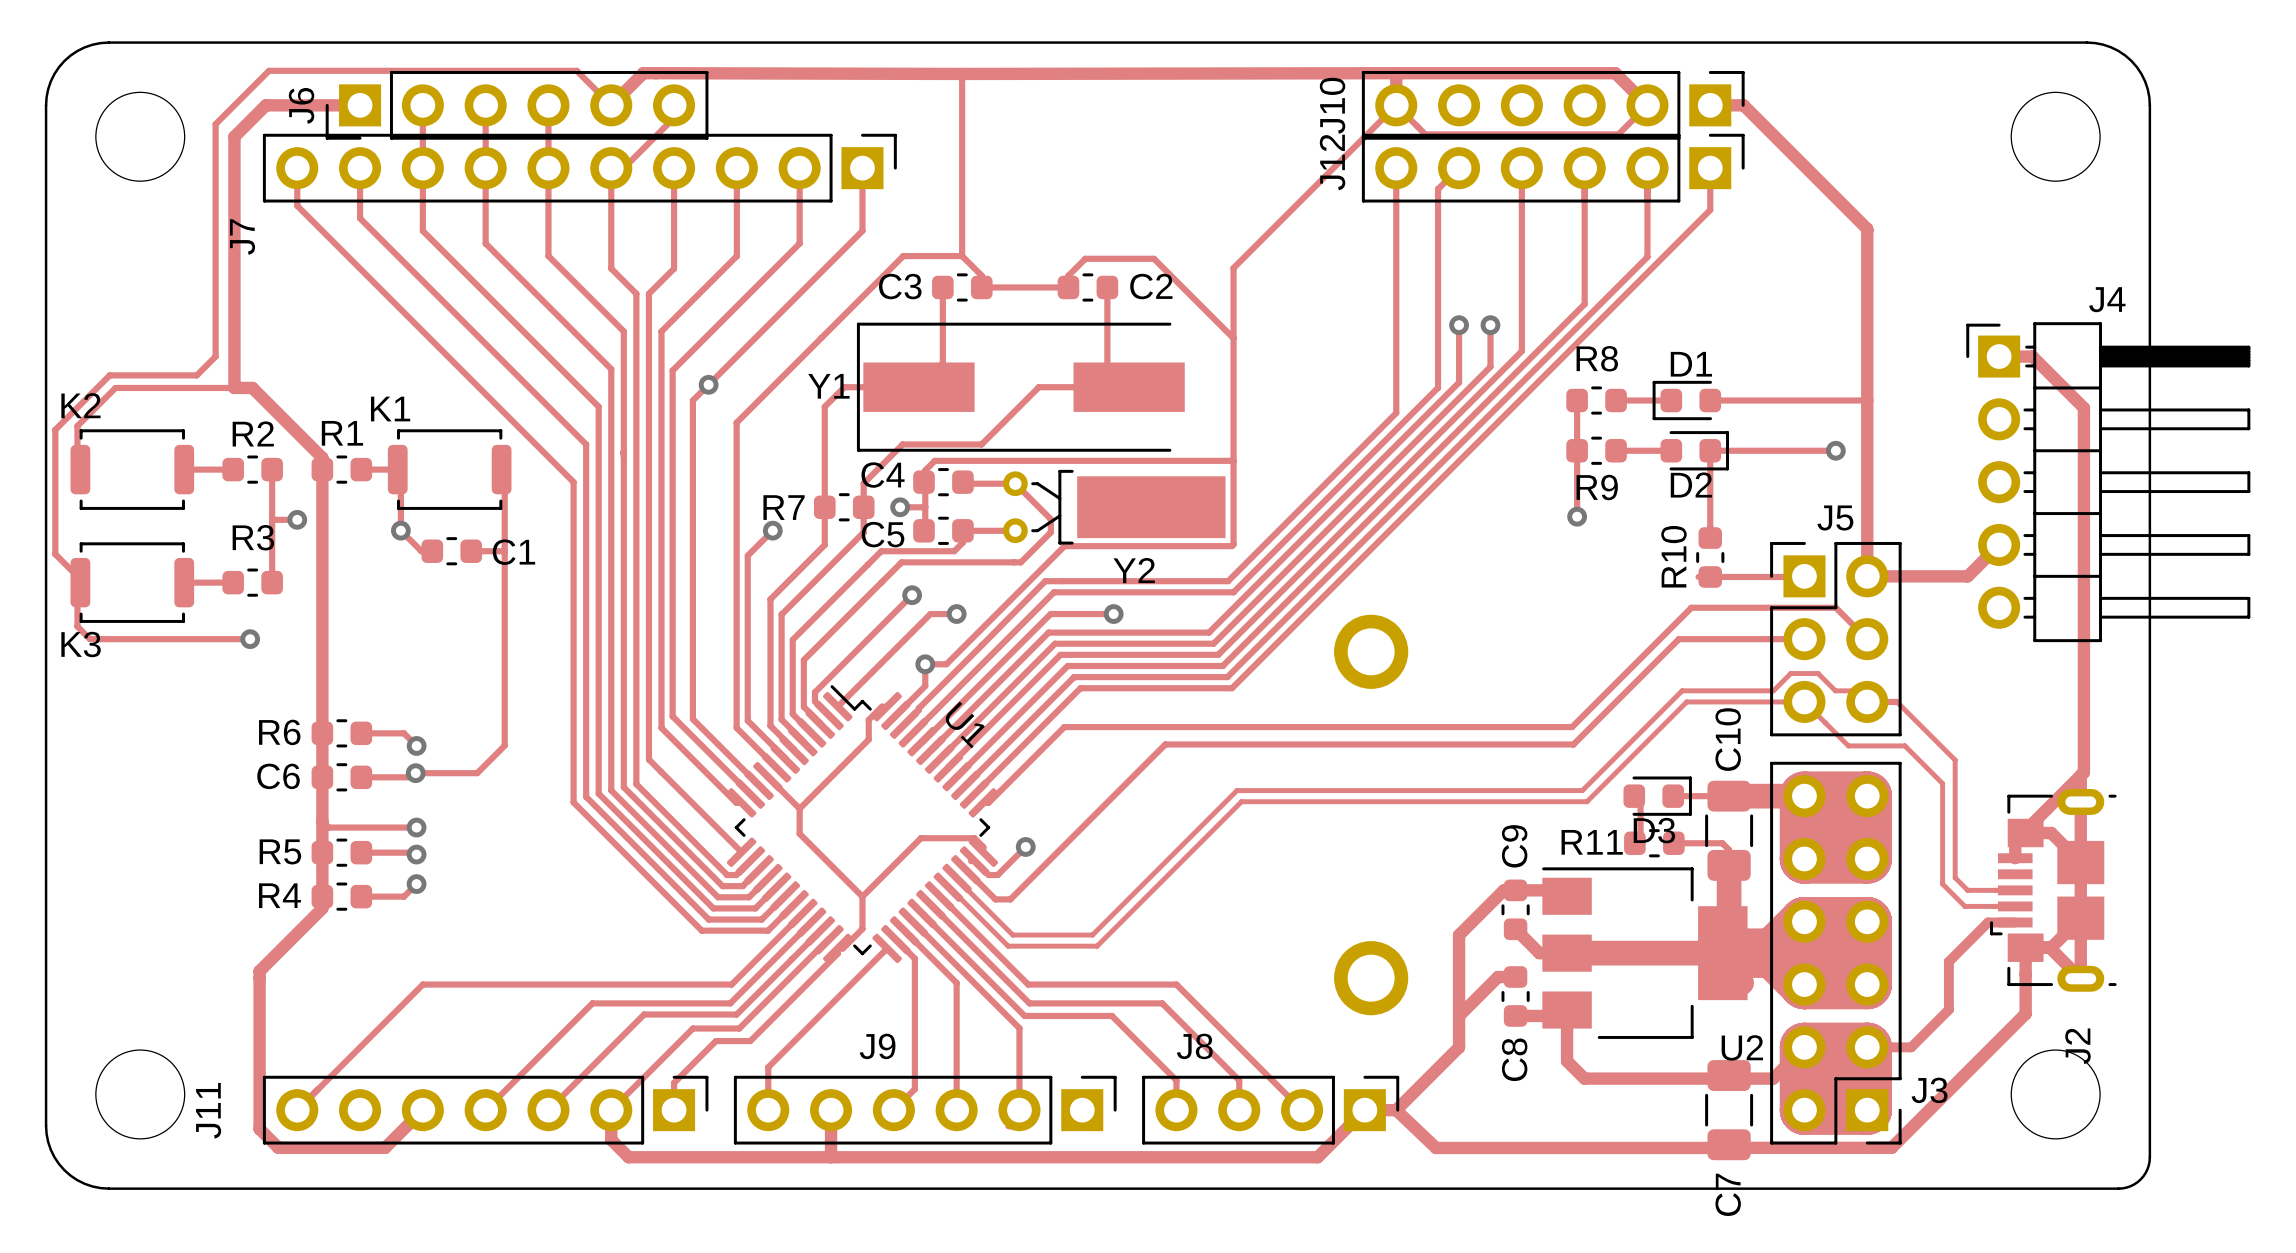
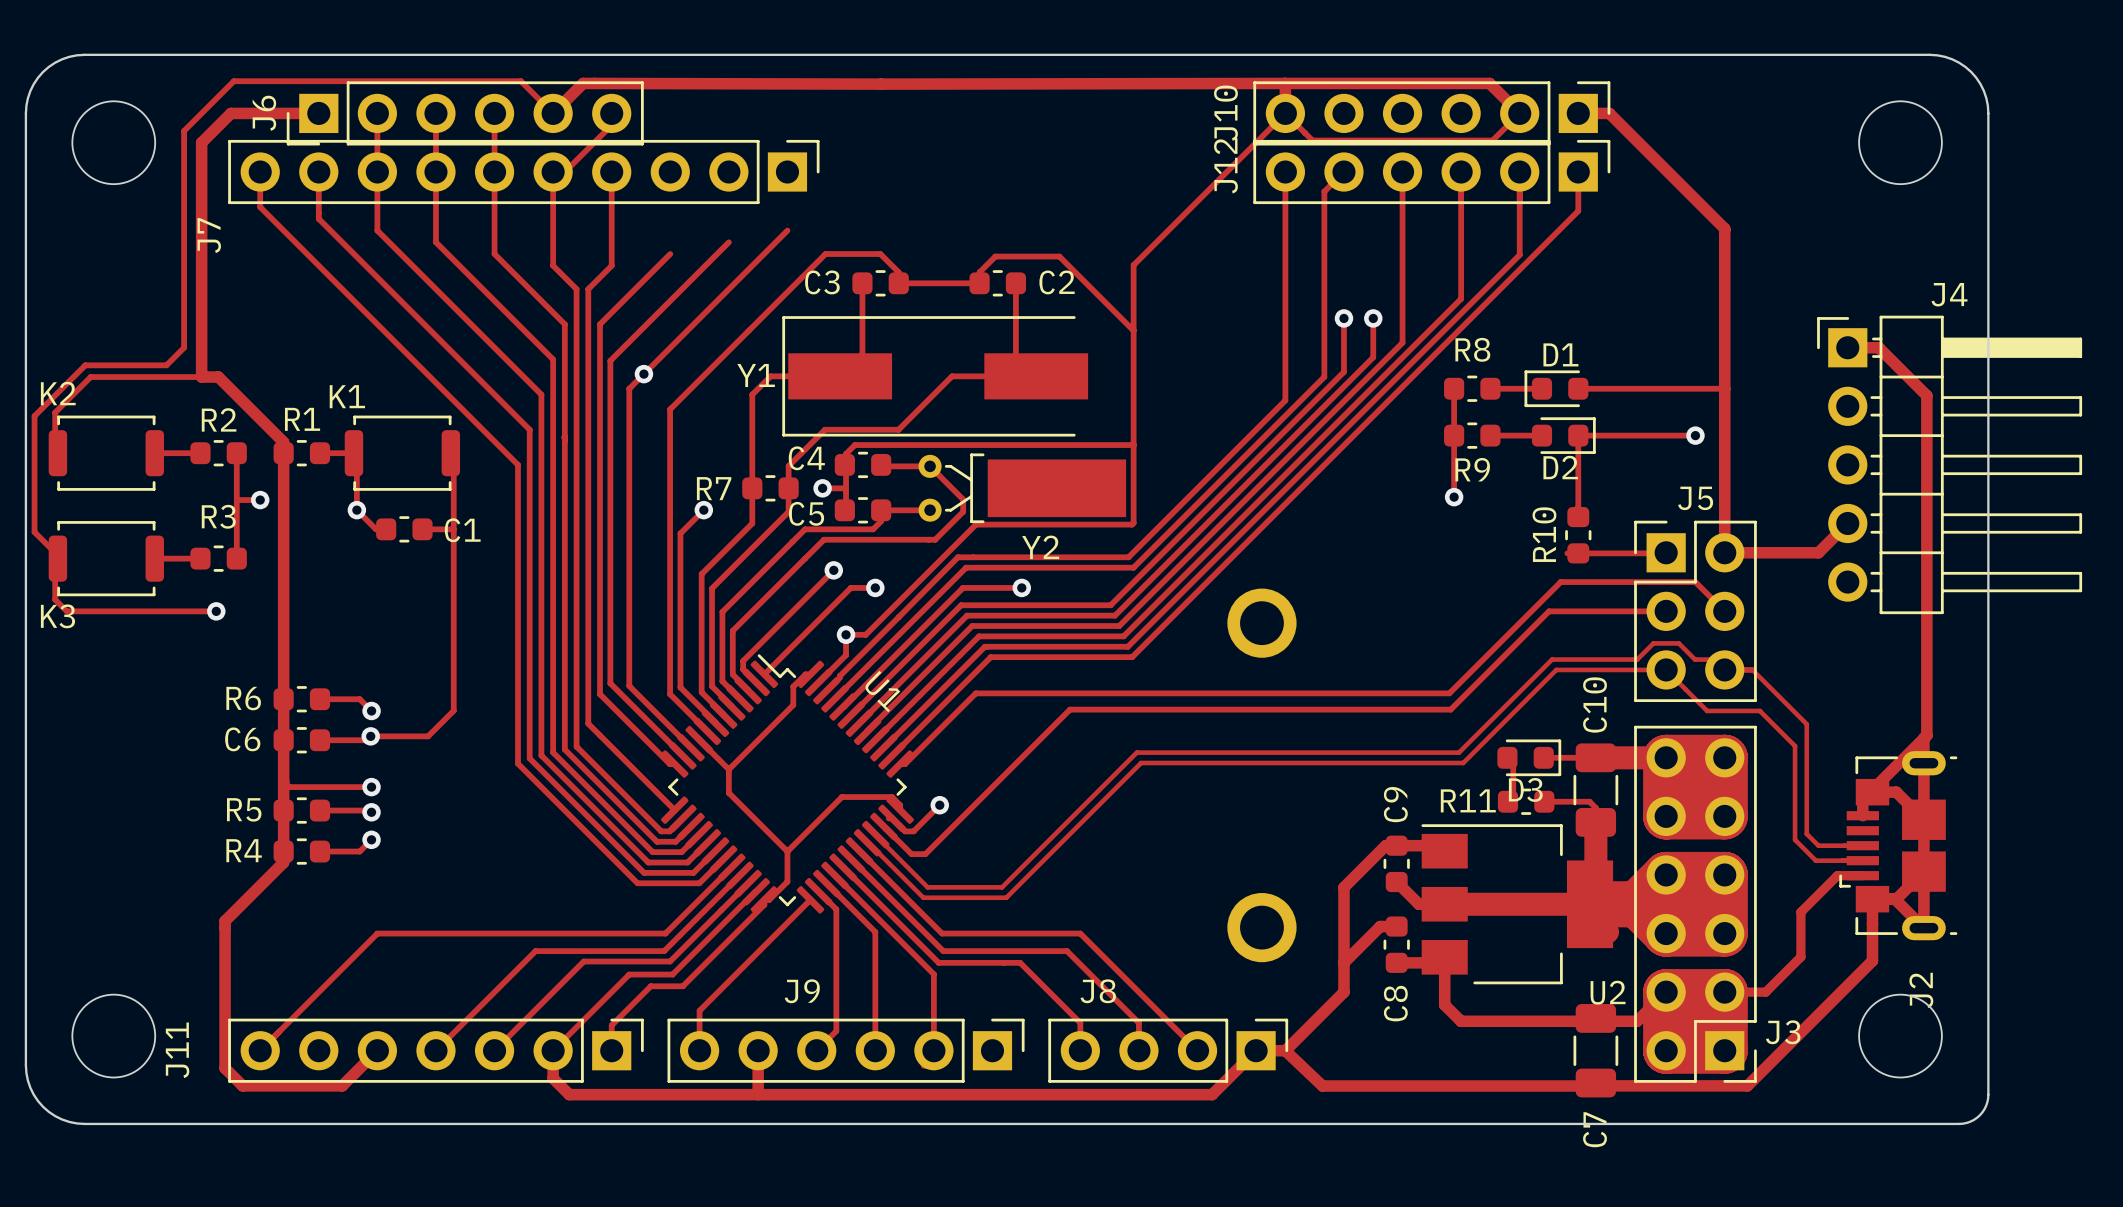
track: (962, 73) (962, 256) -> none
track: (736, 168) (736, 256) -> none
track: (799, 168) (799, 243) -> none
track: (862, 168) (862, 230) -> none

